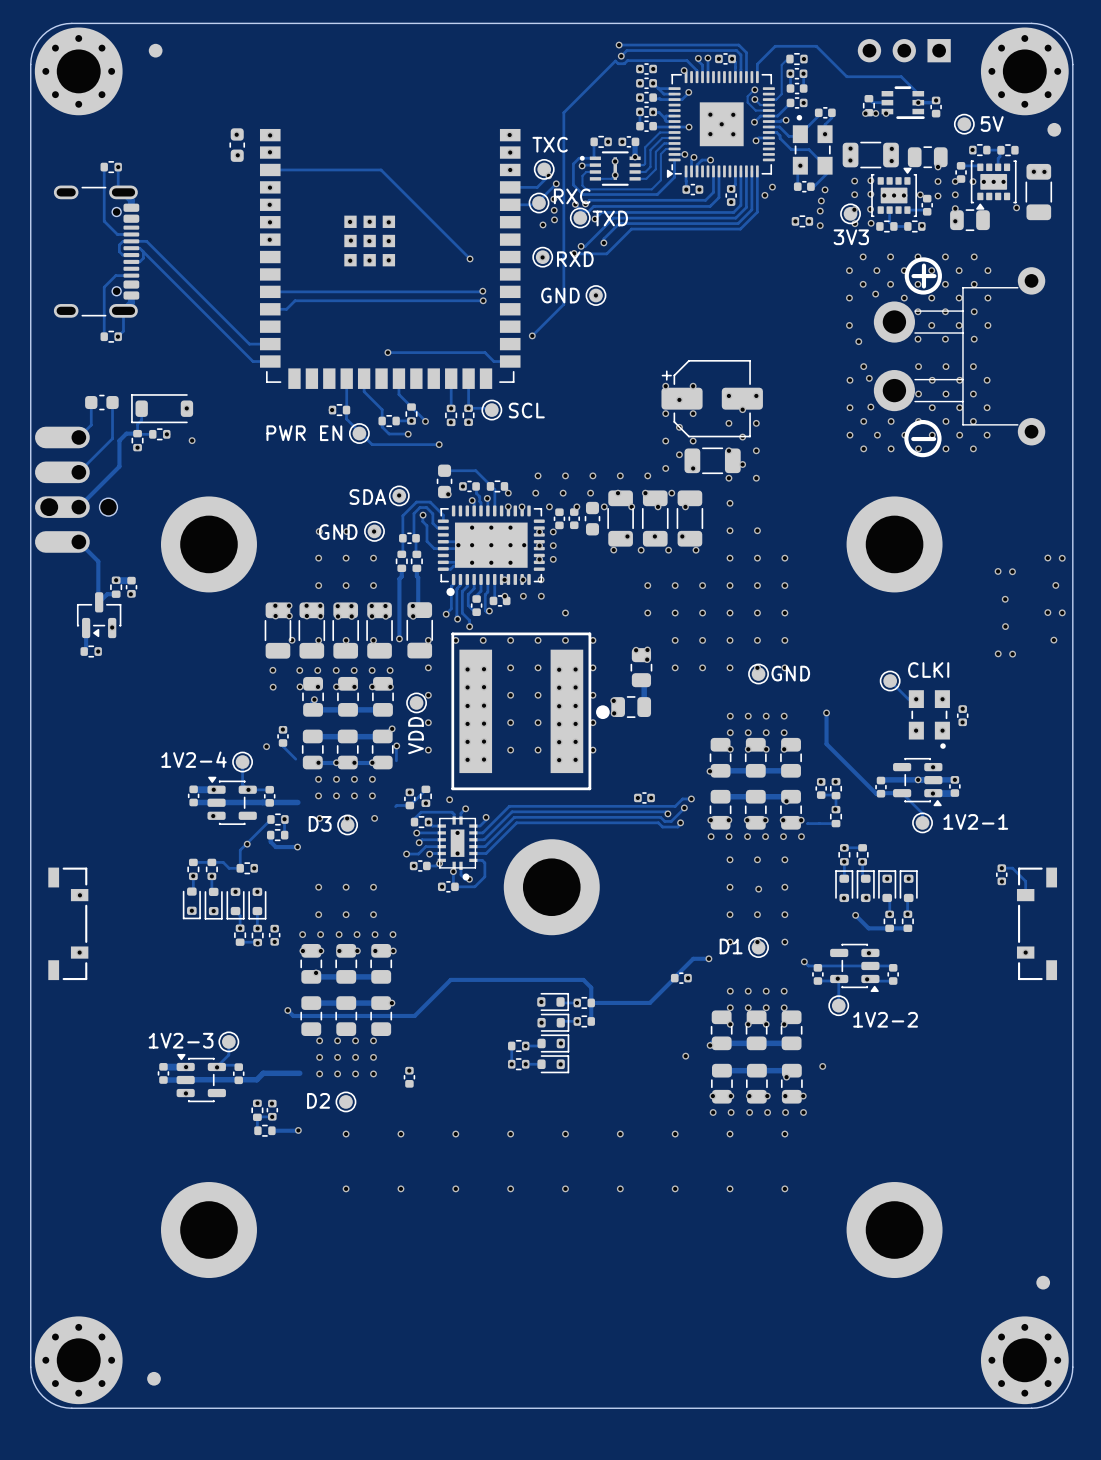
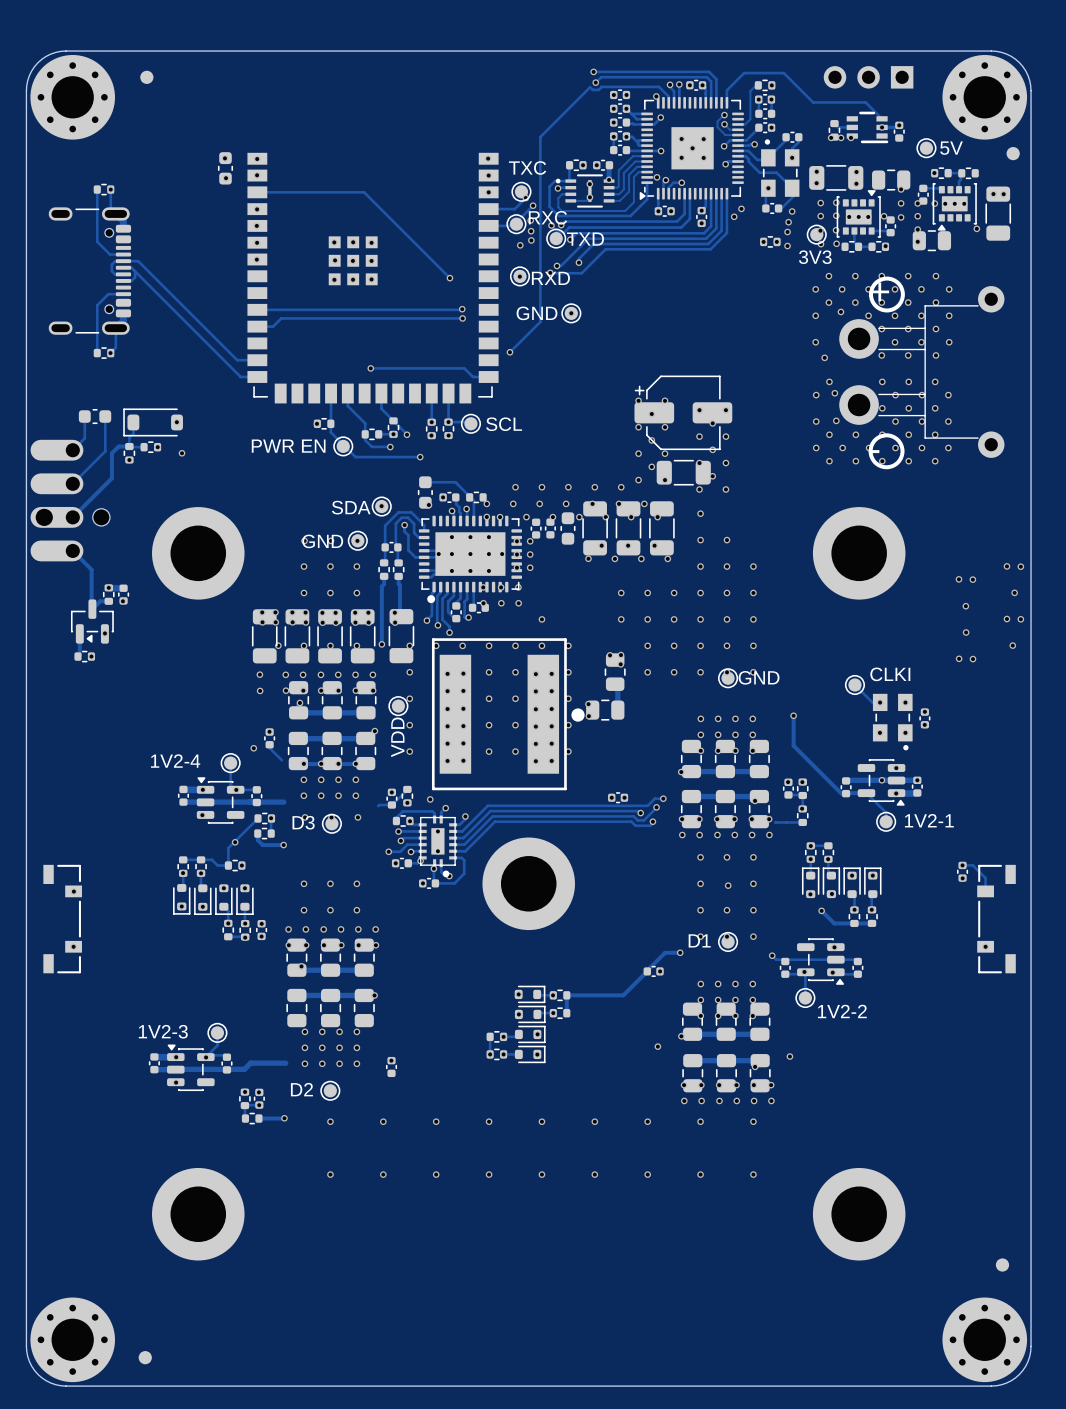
track: (396, 745) (396, 760) -> none
via: (396, 745) -> none
track: (591, 1002) (591, 987) (583, 979) (450, 979) (414, 1015) (293, 1015) (287, 1010) -> none
via: (287, 1010) -> none

